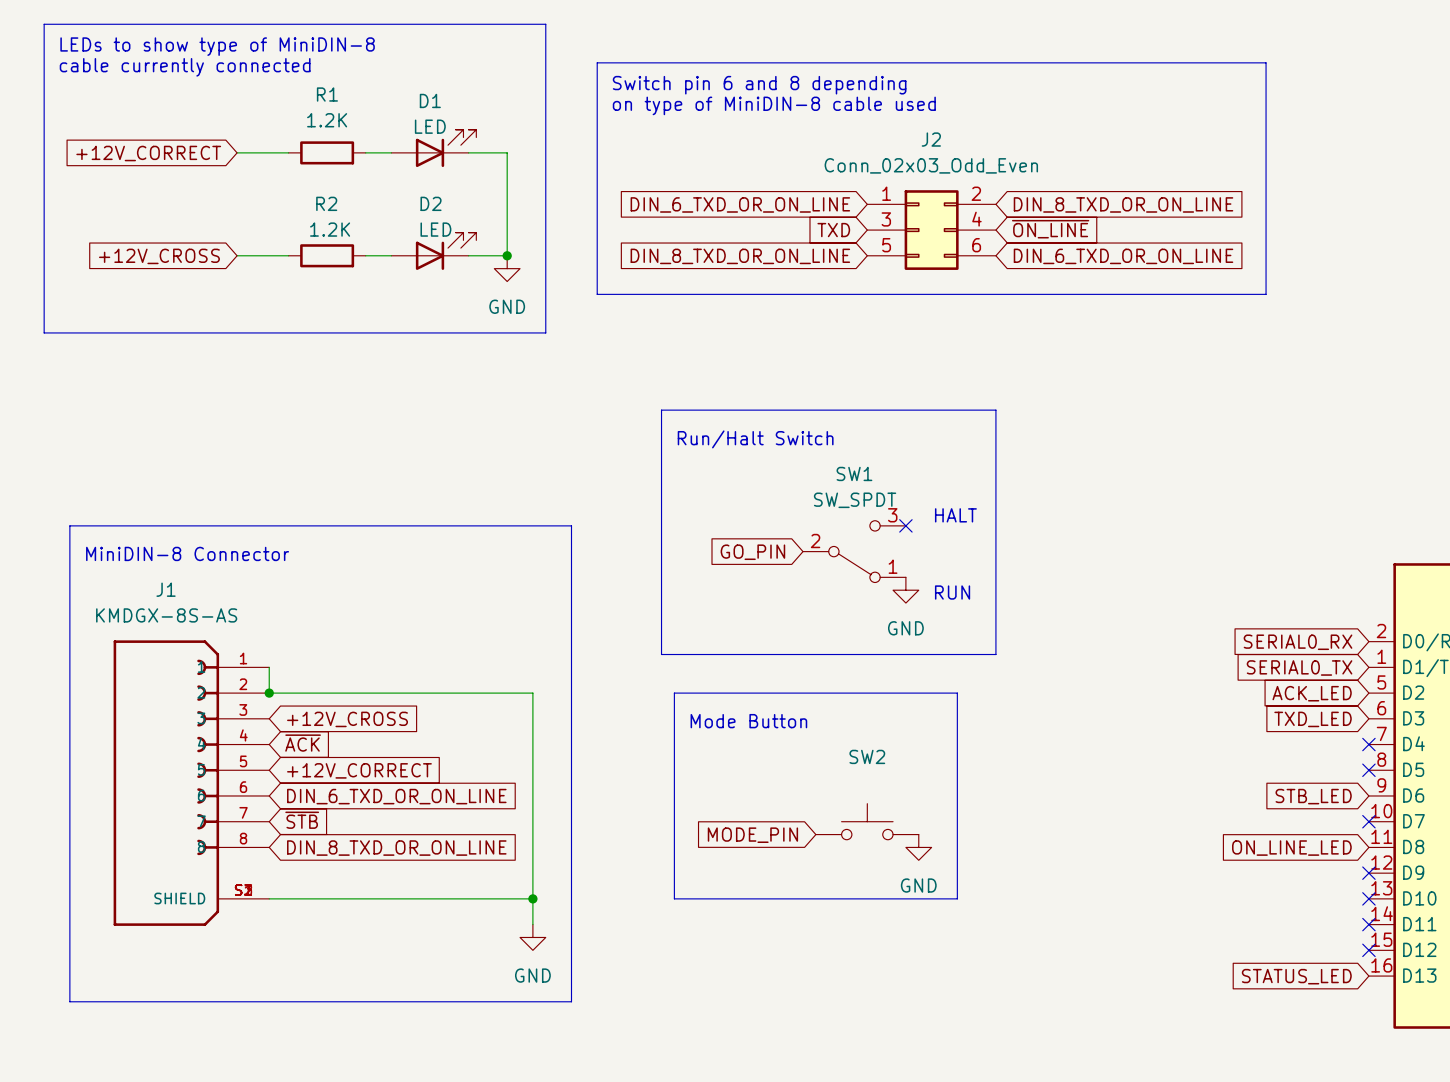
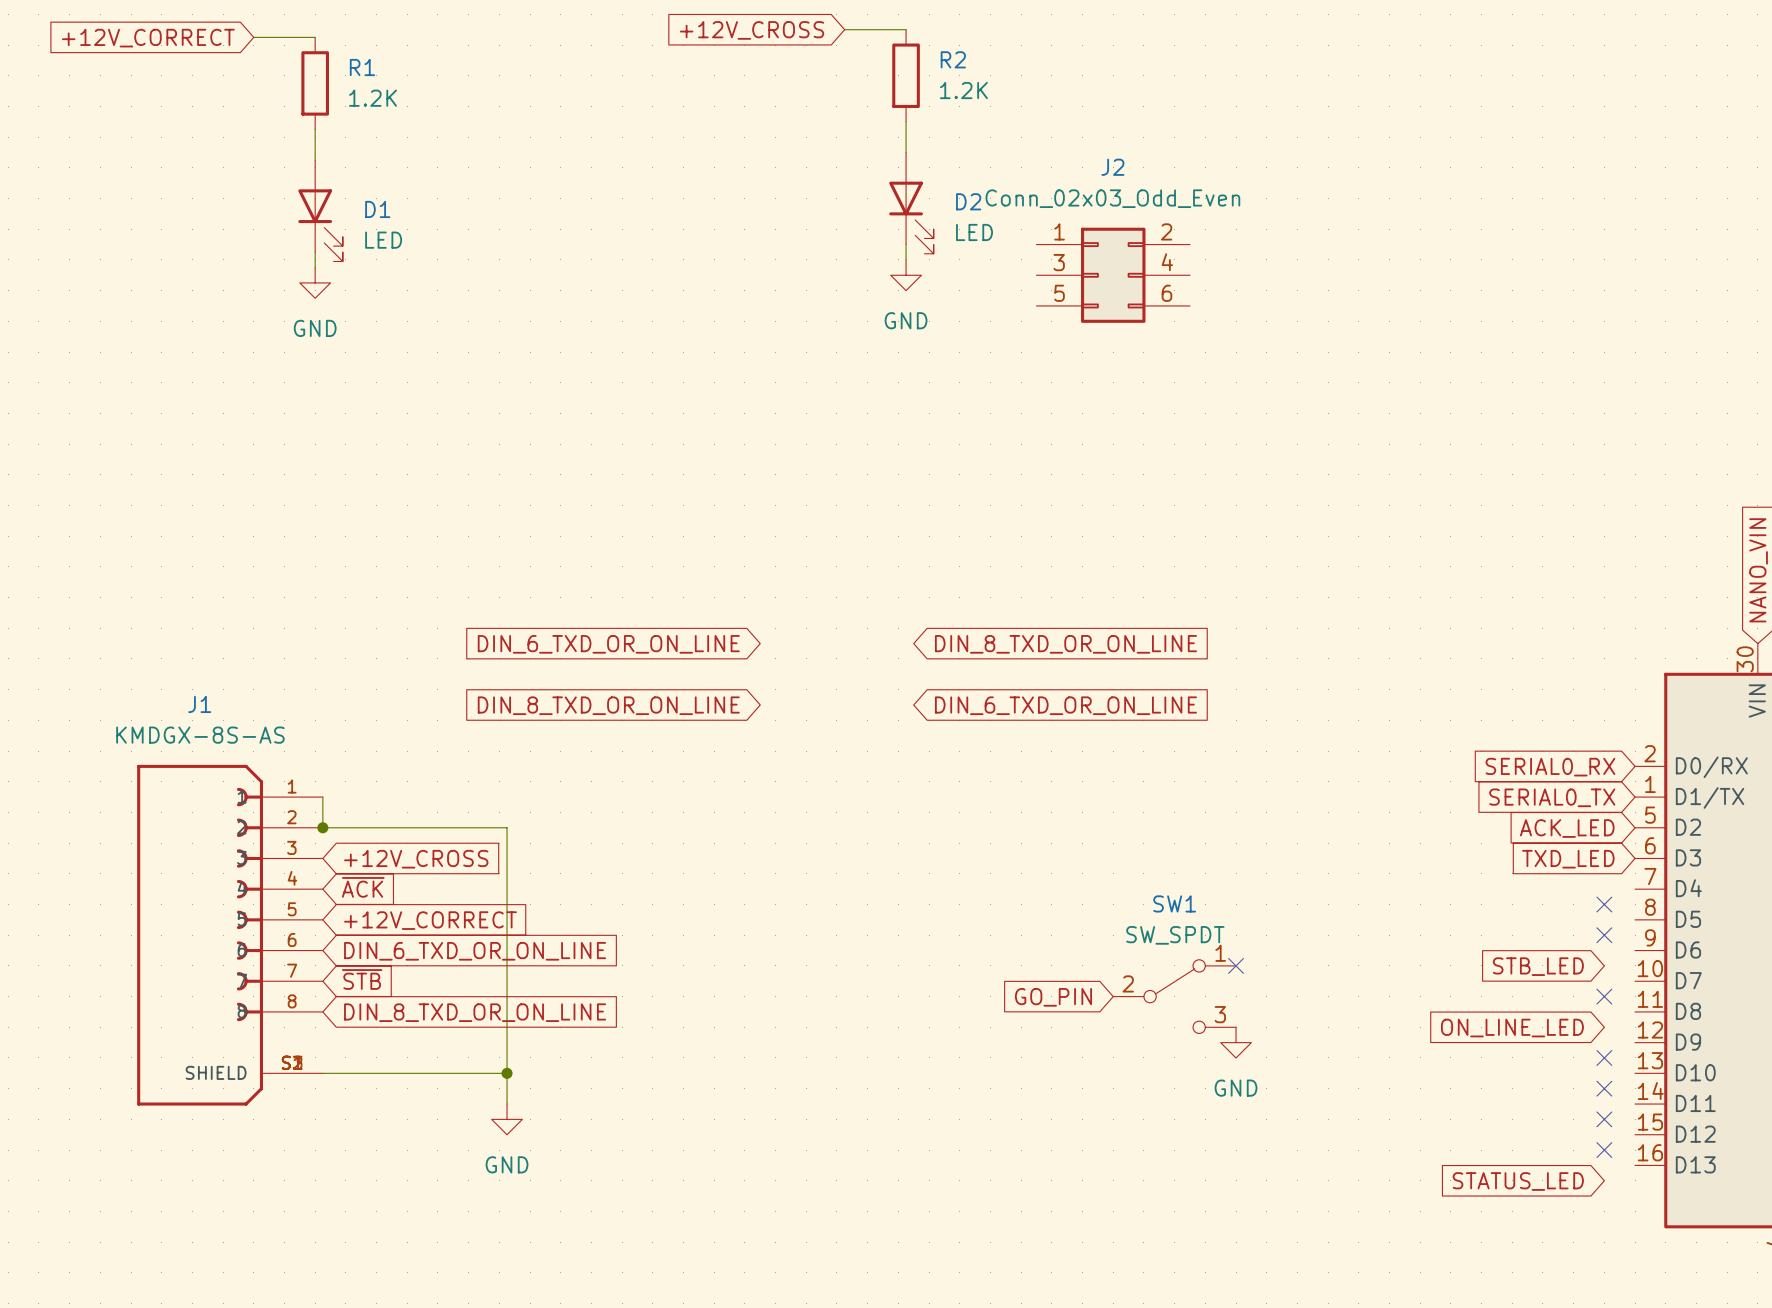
line: (44, 24) (545, 24) (545, 332) (44, 332) (44, 24) -> none
global label: none -> +12V_CROSS (752, 30)
wire: none -> (844, 29) (906, 29)
text: LEDs to show type of MiniDIN-8 (217, 46) -> none
line: (597, 62) (597, 294) (1266, 294) (1266, 62) (597, 62) -> none
text: cable currently connected (185, 67) -> none
text: Switch pin 6 and 8 depending (759, 85) -> none
R1 name position: R1 (327, 94) -> R1 (362, 67)
wire: none -> (906, 121) (906, 152)
text: on type of MiniDIN-8 cable used (774, 105) -> none
wire: none -> (315, 129) (315, 160)
R1 value position: 1.2K (327, 120) -> 1.2K (373, 98)
D1 value position: LED (430, 126) -> LED (383, 240)
D1 position: (433, 148) -> (320, 210)
D1 rotation: 0° (446, 148) -> 90° clockwise (320, 225)
wire: (237, 152) (288, 152) -> (253, 37) (315, 37)
R1 rotation: 0° (327, 152) -> 90° clockwise (315, 83)
R1 position: (327, 152) -> (315, 83)
wire: (365, 152) (391, 152) -> none
wire: (468, 152) (507, 152) (507, 255) (468, 255) -> none
global label position: +12V_CORRECT (148, 153) -> +12V_CORRECT (148, 38)
global label: DIN_6_TXD_OR_ON_LINE (740, 204) -> none
wire: none -> (906, 244) (906, 259)
global label: DIN_8_TXD_OR_ON_LINE (1123, 204) -> none
wire: none -> (315, 252) (315, 267)
R2 value position: 1.2K (330, 229) -> 1.2K (963, 90)
D2 value position: LED (435, 229) -> LED (974, 232)
global label: ~{ON_LINE} (1050, 229) -> none
power symbol: none -> GND (906, 275)
global label: TXD (833, 230) -> none
power symbol: none -> GND (315, 282)
D2 position: (433, 251) -> (911, 203)
D2 rotation: 0° (446, 251) -> 90° clockwise (911, 217)
wire: (237, 255) (288, 255) -> none
R2 rotation: 0° (327, 255) -> 90° clockwise (906, 75)
R2 position: (327, 255) -> (906, 75)
wire: (365, 255) (391, 255) -> none
junction: (507, 255) -> none
global label: +12V_CROSS (159, 256) -> none
global label: DIN_8_TXD_OR_ON_LINE (740, 256) -> none
global label: DIN_6_TXD_OR_ON_LINE (1123, 256) -> none
power symbol: GND (507, 268) -> none
line: (661, 410) (661, 654) (995, 654) (995, 410) (661, 410) -> none
text: Run/Halt Switch (755, 439) -> none
text: HALT (955, 515) -> none
line: (69, 525) (571, 525) (571, 1001) (69, 1001) (69, 525) -> none
no-connect mark: (905, 525) -> none
global label: none -> DIN_6_TXD_OR_ON_LINE (608, 644)
global label: none -> DIN_8_TXD_OR_ON_LINE (1065, 644)
SW1 flip: as is (854, 551) -> up-down (1174, 996)
SW1 position: (854, 551) -> (1174, 996)
global label: GO_PIN (752, 552) -> none
text: MiniDIN-8 Connector (187, 553) -> none
global label: none -> DIN_8_TXD_OR_ON_LINE (608, 705)
global label: none -> DIN_6_TXD_OR_ON_LINE (1065, 705)
power symbol: GND (905, 590) -> none
text: RUN (952, 592) -> none
wire: (423, 693) (532, 693) (532, 924) -> (507, 827) (507, 1104)
line: (674, 693) (674, 898) (957, 898) (957, 693) (674, 693) -> none
text: Mode Button (748, 721) -> none
no-connect mark: (1368, 744) -> none
no-connect mark: none -> (1604, 904)
no-connect mark: (1368, 770) -> none
no-connect mark: none -> (1604, 935)
global label position: STB_LED (1313, 796) -> STB_LED (1538, 966)
no-connect mark: none -> (1236, 965)
SW2: (867, 821) -> none
no-connect mark: (1368, 821) -> none
no-connect mark: none -> (1604, 996)
global label: MODE_PIN (752, 835) -> none
global label: none -> GO_PIN (1053, 997)
power symbol position: GND (918, 847) -> GND (1236, 1042)
global label position: ON_LINE_LED (1291, 848) -> ON_LINE_LED (1512, 1028)
no-connect mark: (1368, 873) -> none
no-connect mark: none -> (1604, 1057)
wire: (423, 898) (532, 898) -> none
junction: none -> (507, 1073)
junction: (532, 898) -> none
no-connect mark: (1368, 898) -> none
no-connect mark: none -> (1604, 1088)
no-connect mark: (1368, 924) -> none
power symbol position: GND (532, 937) -> GND (507, 1119)
no-connect mark: none -> (1604, 1119)
no-connect mark: (1368, 950) -> none
no-connect mark: none -> (1604, 1150)
global label position: STATUS_LED (1296, 976) -> STATUS_LED (1518, 1181)

